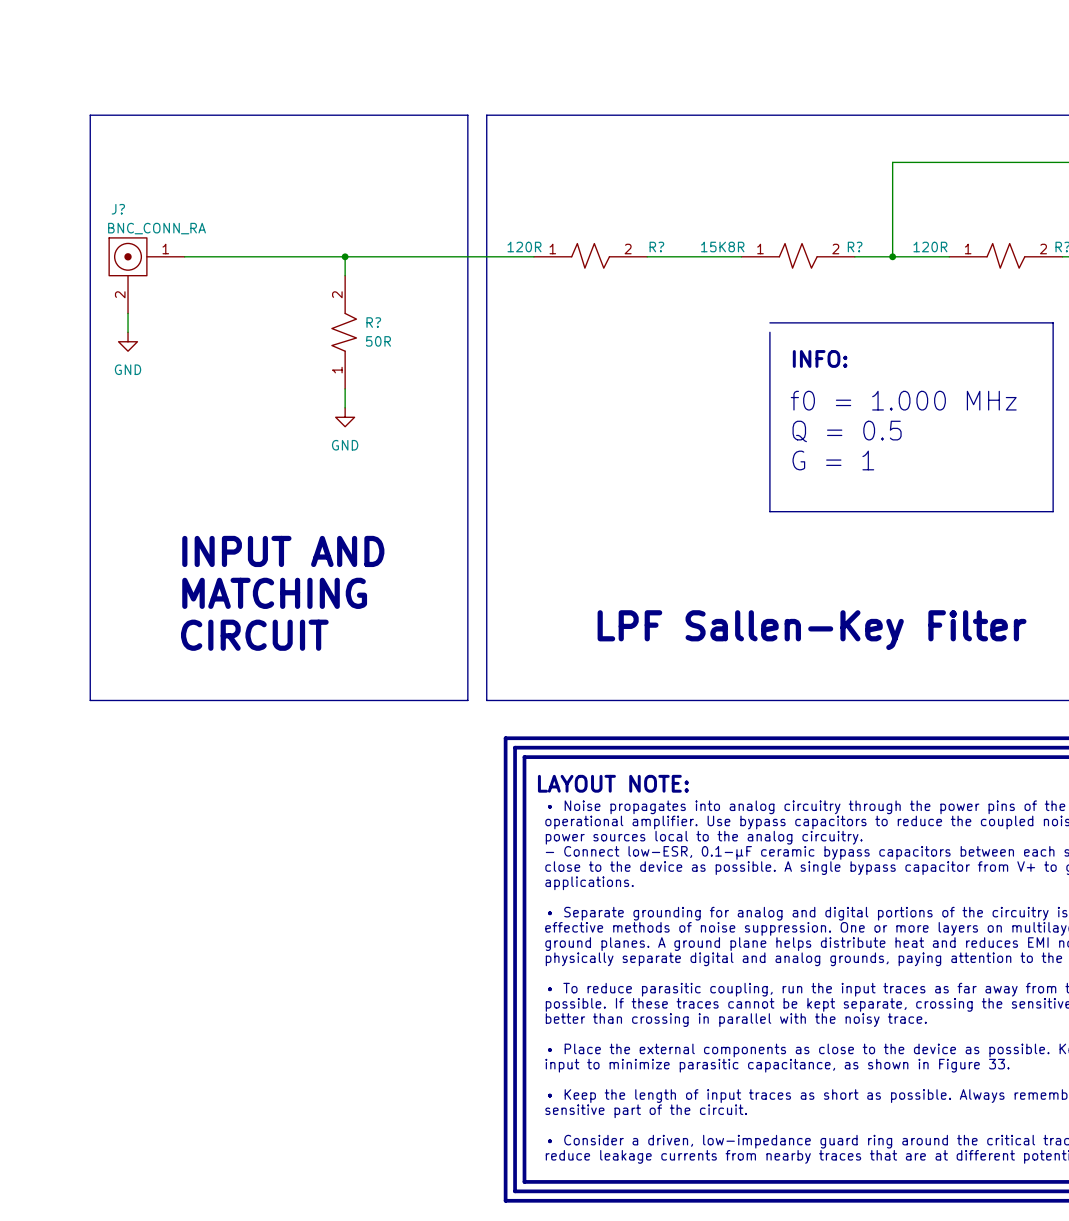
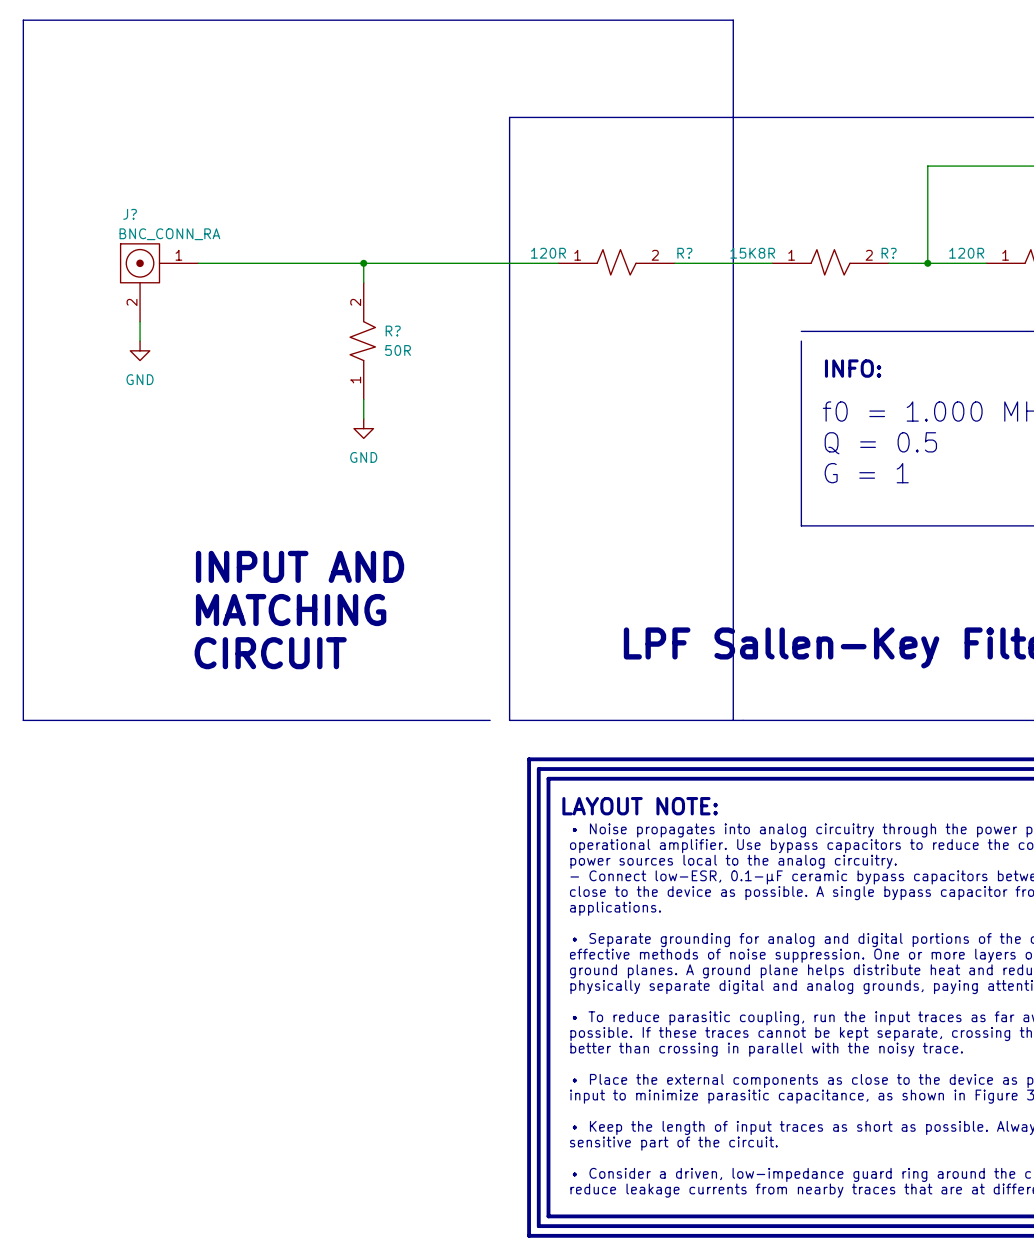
line: (90, 700) (90, 115) (467, 115) (467, 700) -> (101, 720) (23, 720) (23, 20) (733, 20) (733, 720)

